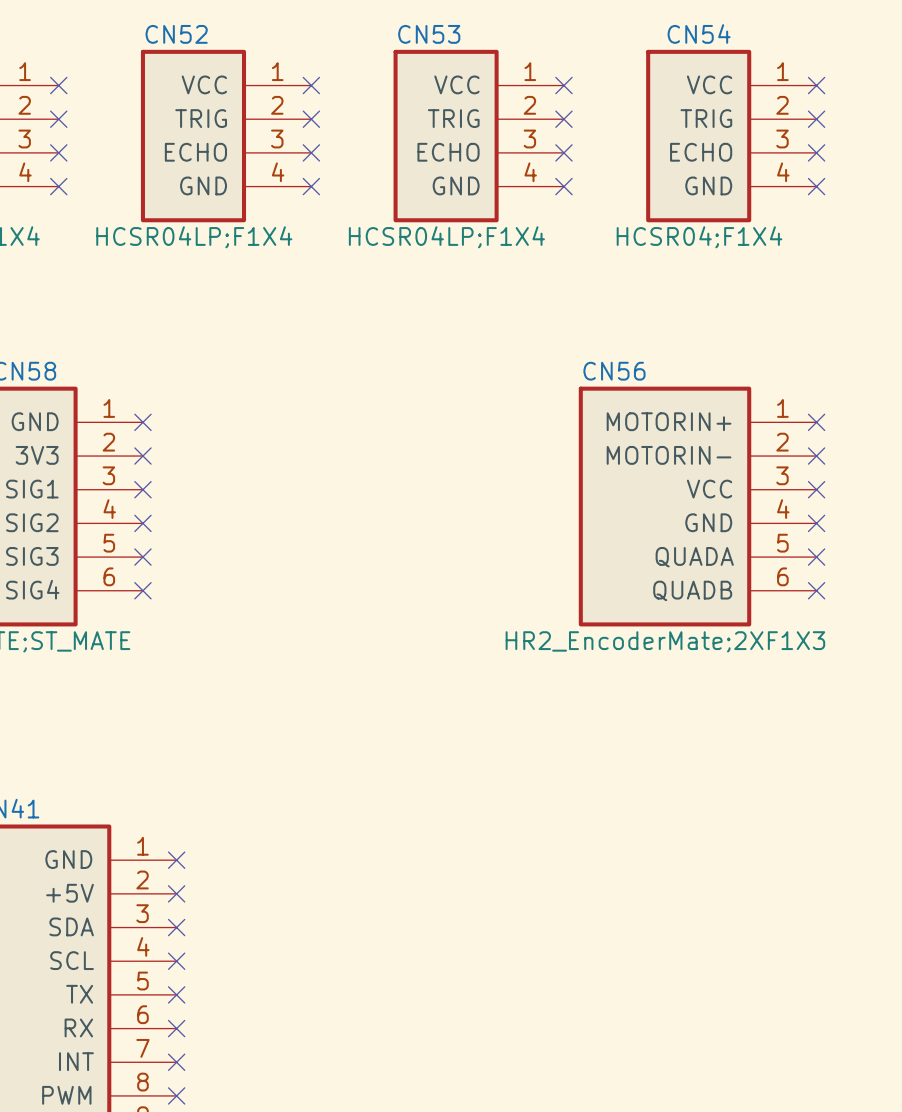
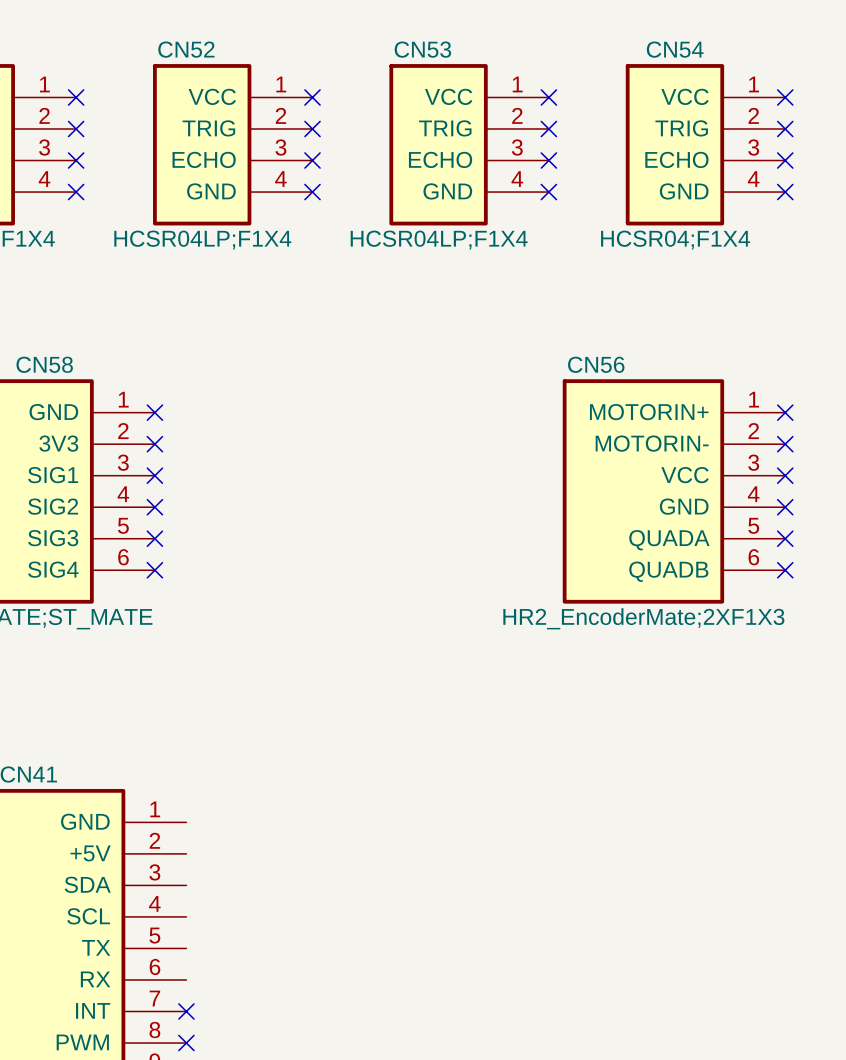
no-connect mark: (176, 860) -> none
no-connect mark: (176, 893) -> none
no-connect mark: (176, 927) -> none
no-connect mark: (176, 961) -> none
no-connect mark: (176, 994) -> none
no-connect mark: (176, 1028) -> none

